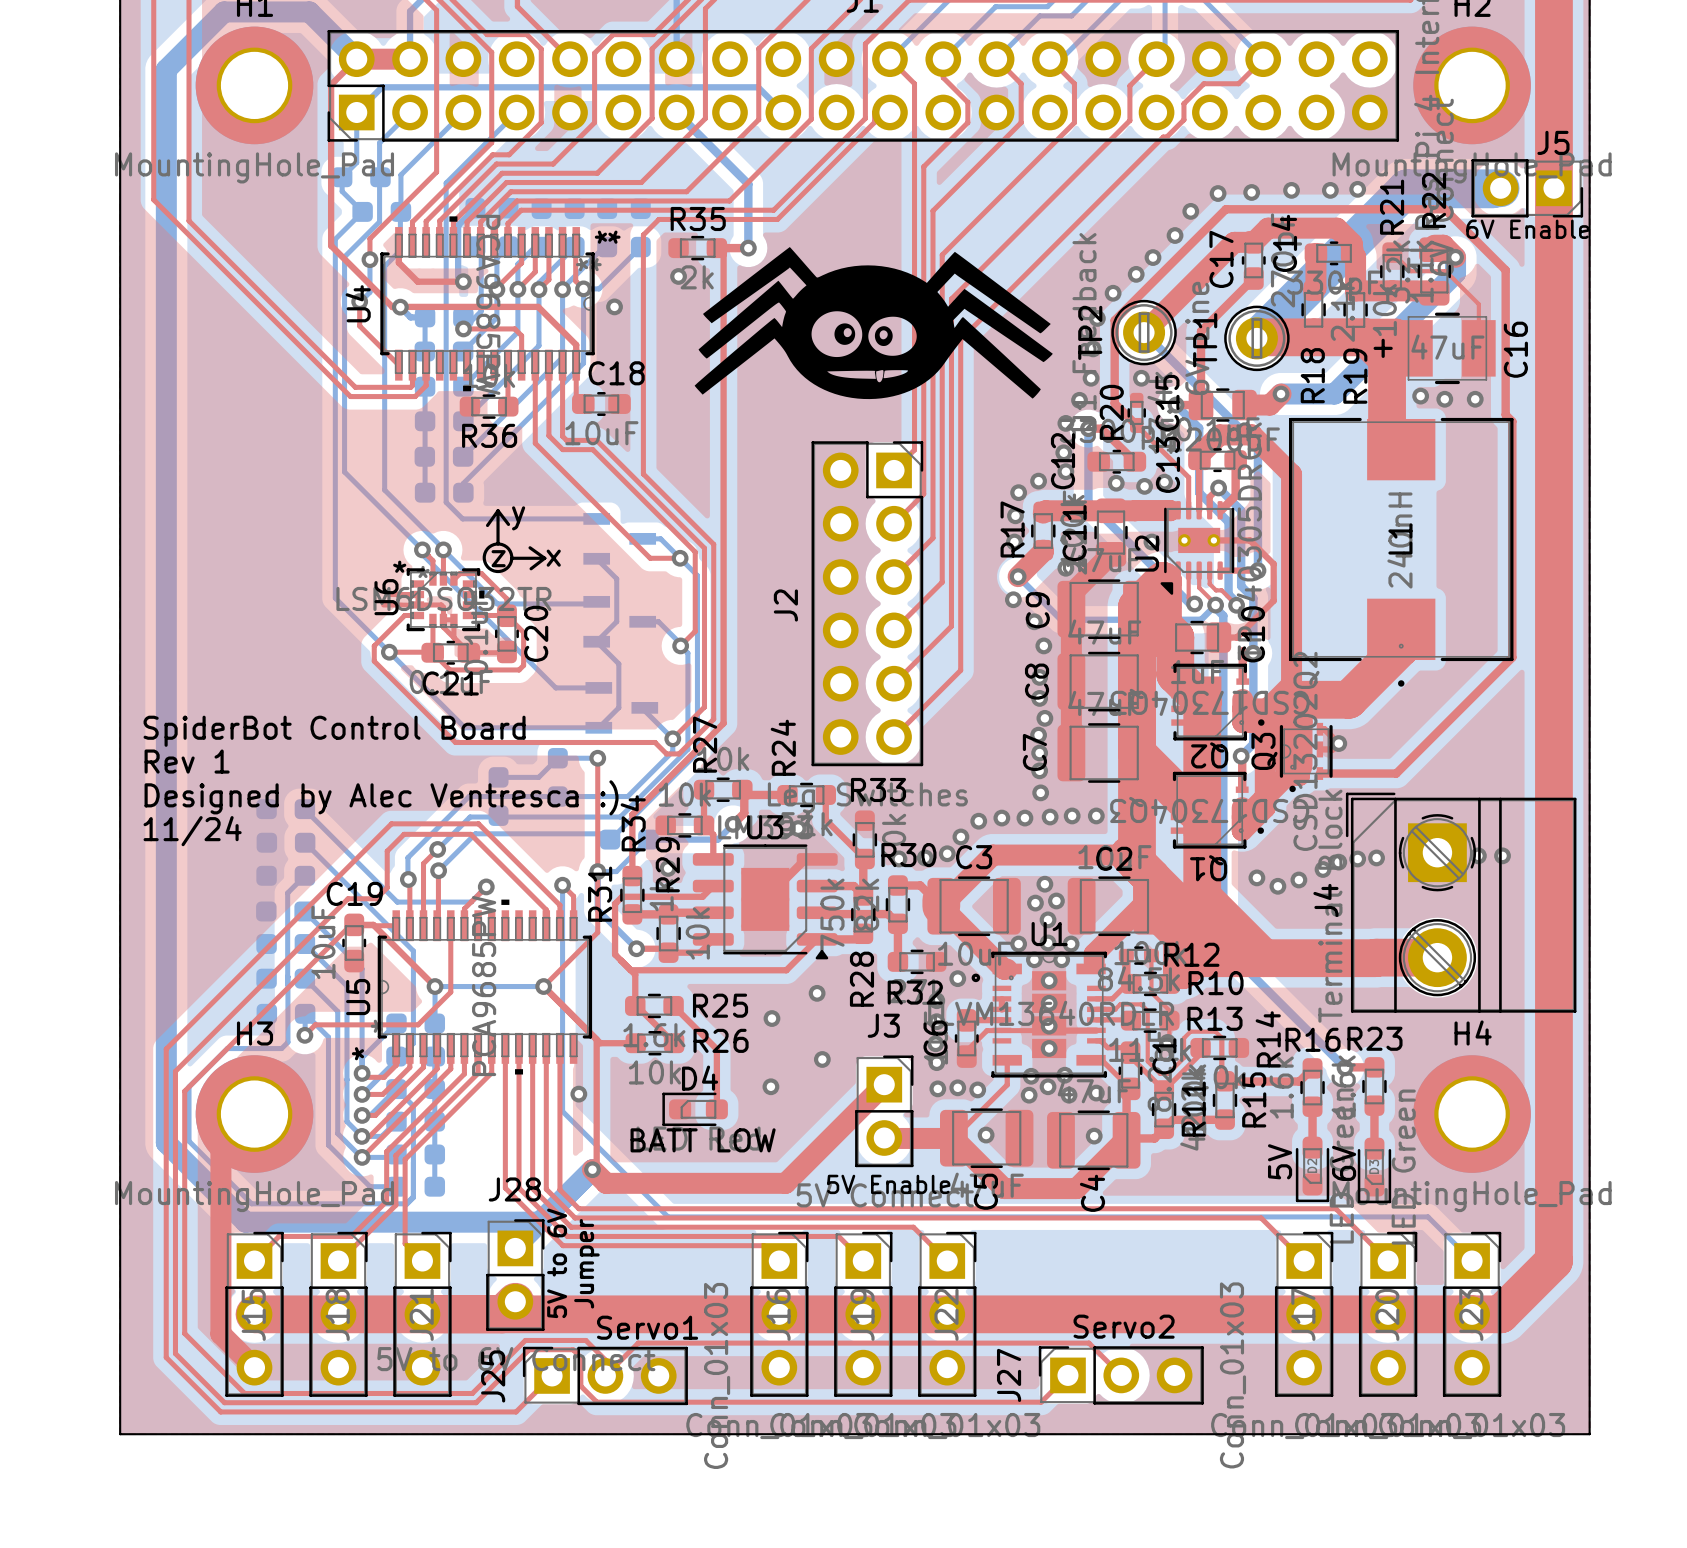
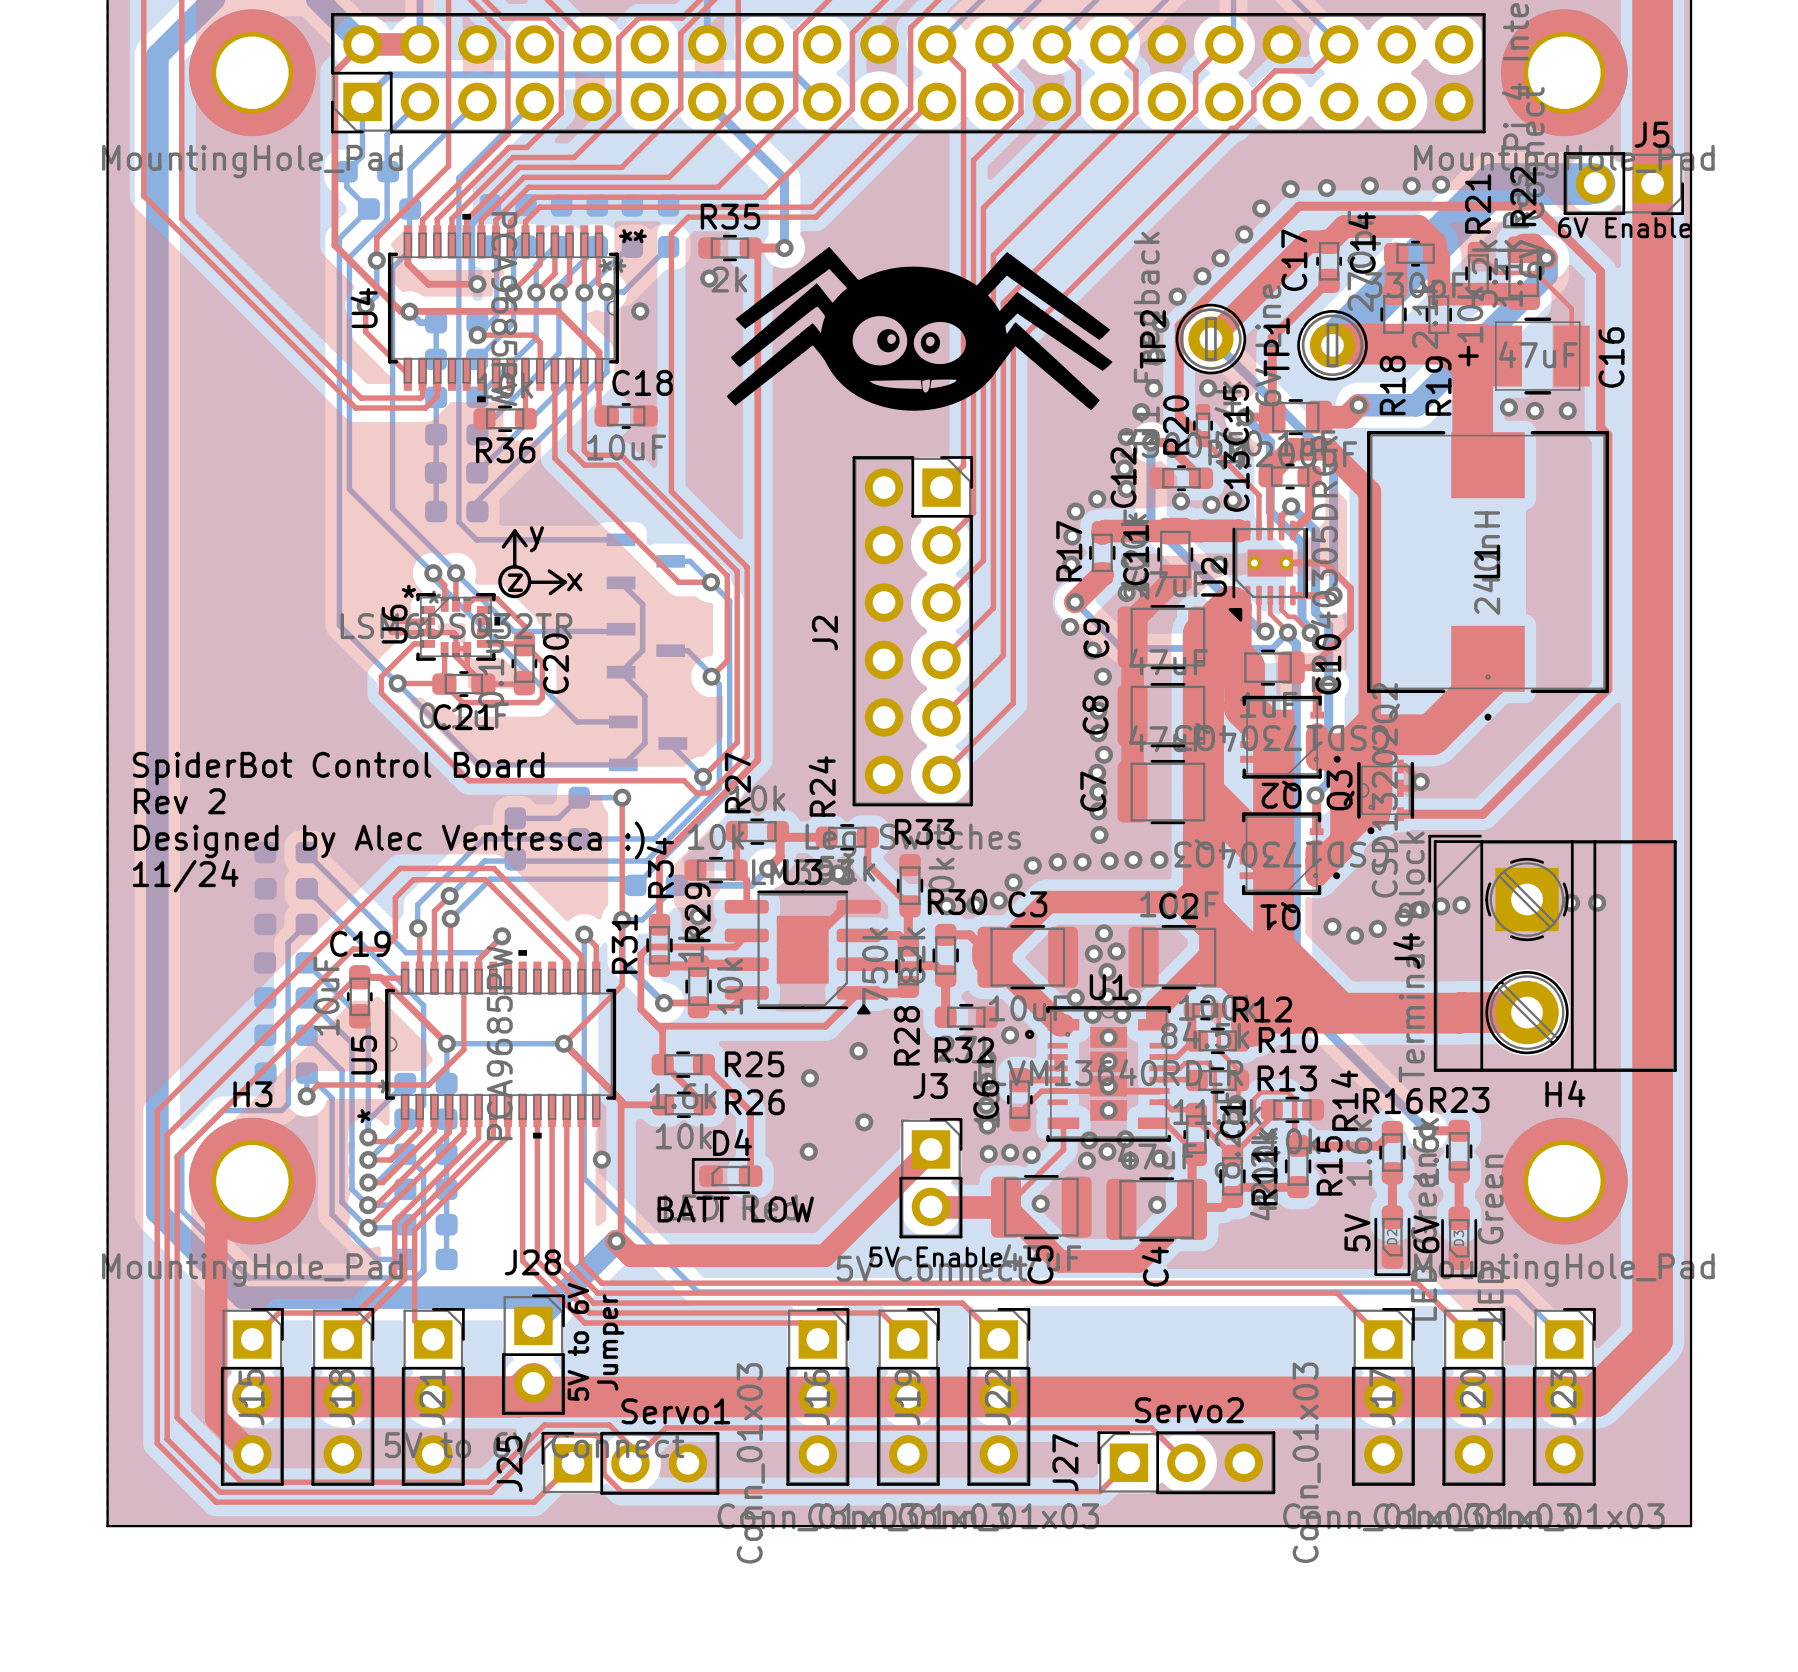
text: Rev 1 (187, 761) -> Rev 2 (179, 801)

